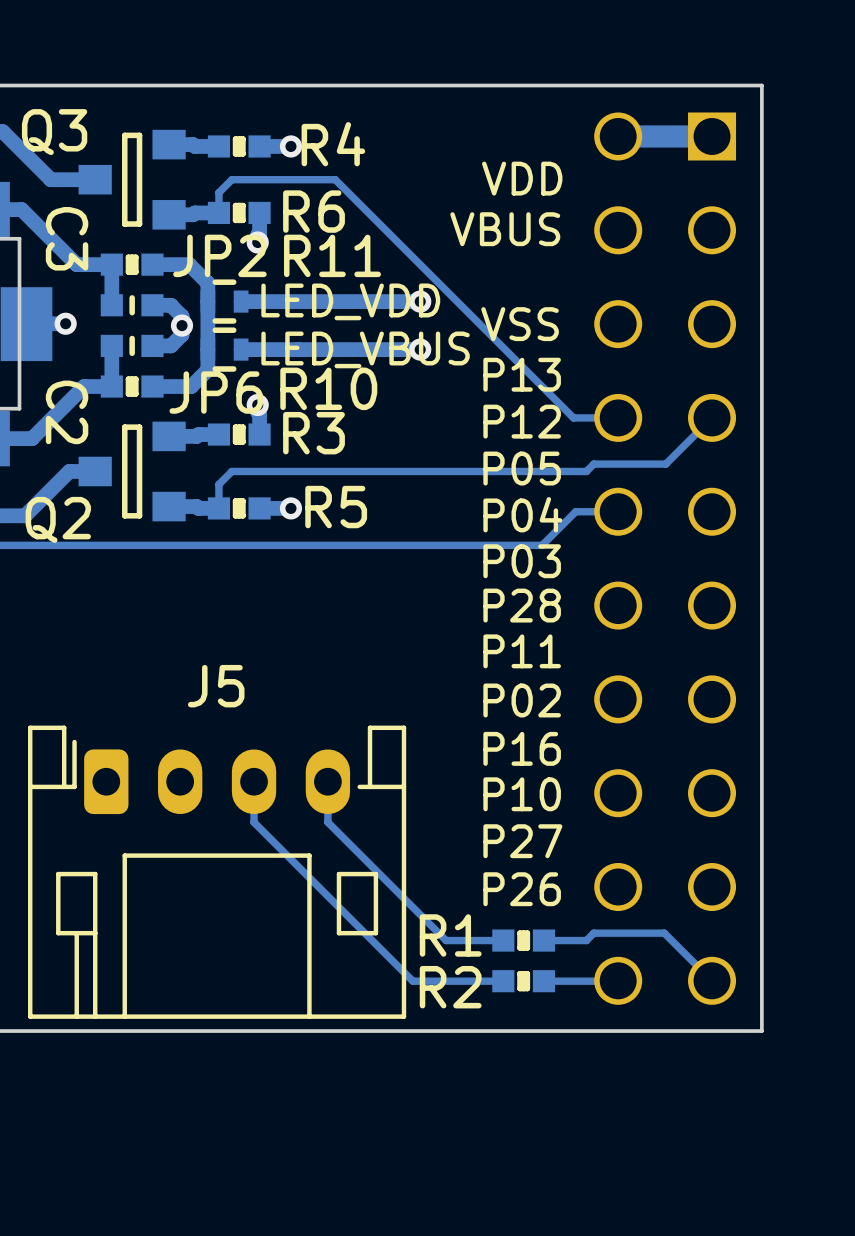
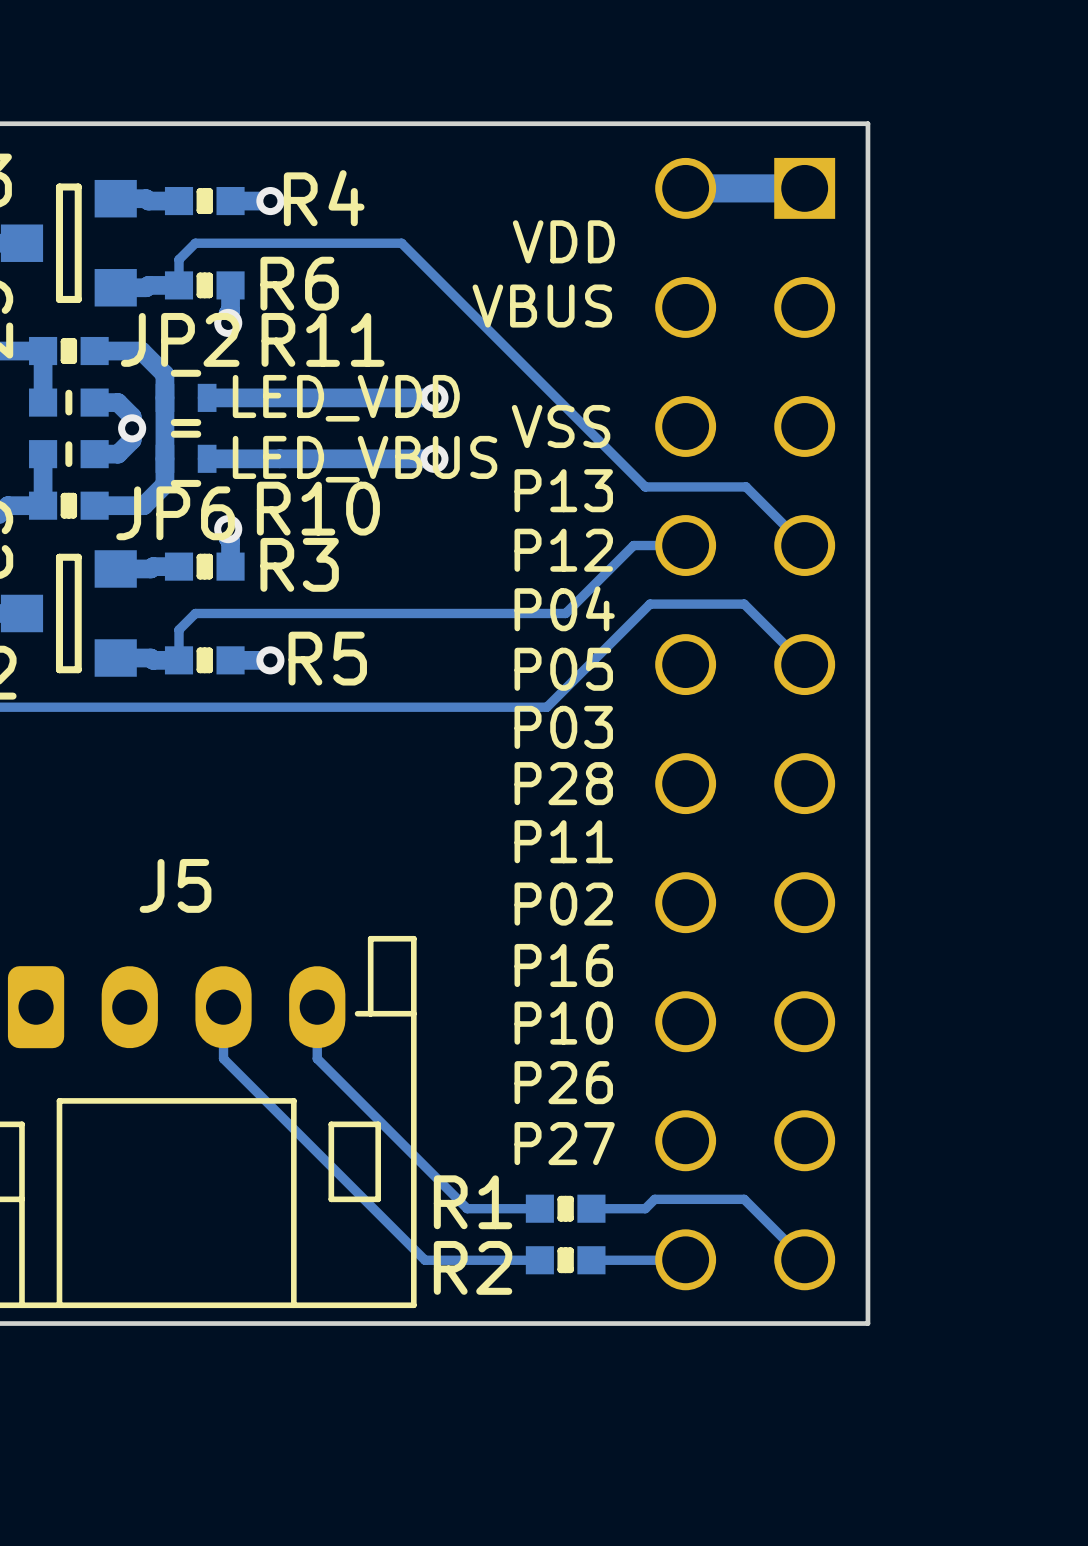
track: (335, 179) (573, 417) (577, 417) -> (326, 243) (401, 243) (645, 486) (746, 486) (804, 545)
track: (712, 417) (664, 464) -> (804, 664) (744, 604)
track: (593, 464) (586, 471) (523, 471) -> (633, 545) (565, 613)
text: P05 (522, 468) -> P04 (564, 608)
track: (618, 511) (575, 511) (542, 545) (508, 545) -> (654, 604) (650, 604) (546, 707)
text: P04 (522, 514) -> P05 (563, 669)
text: P27 (522, 841) -> P26 (563, 1082)
text: P26 (522, 889) -> P27 (564, 1143)

